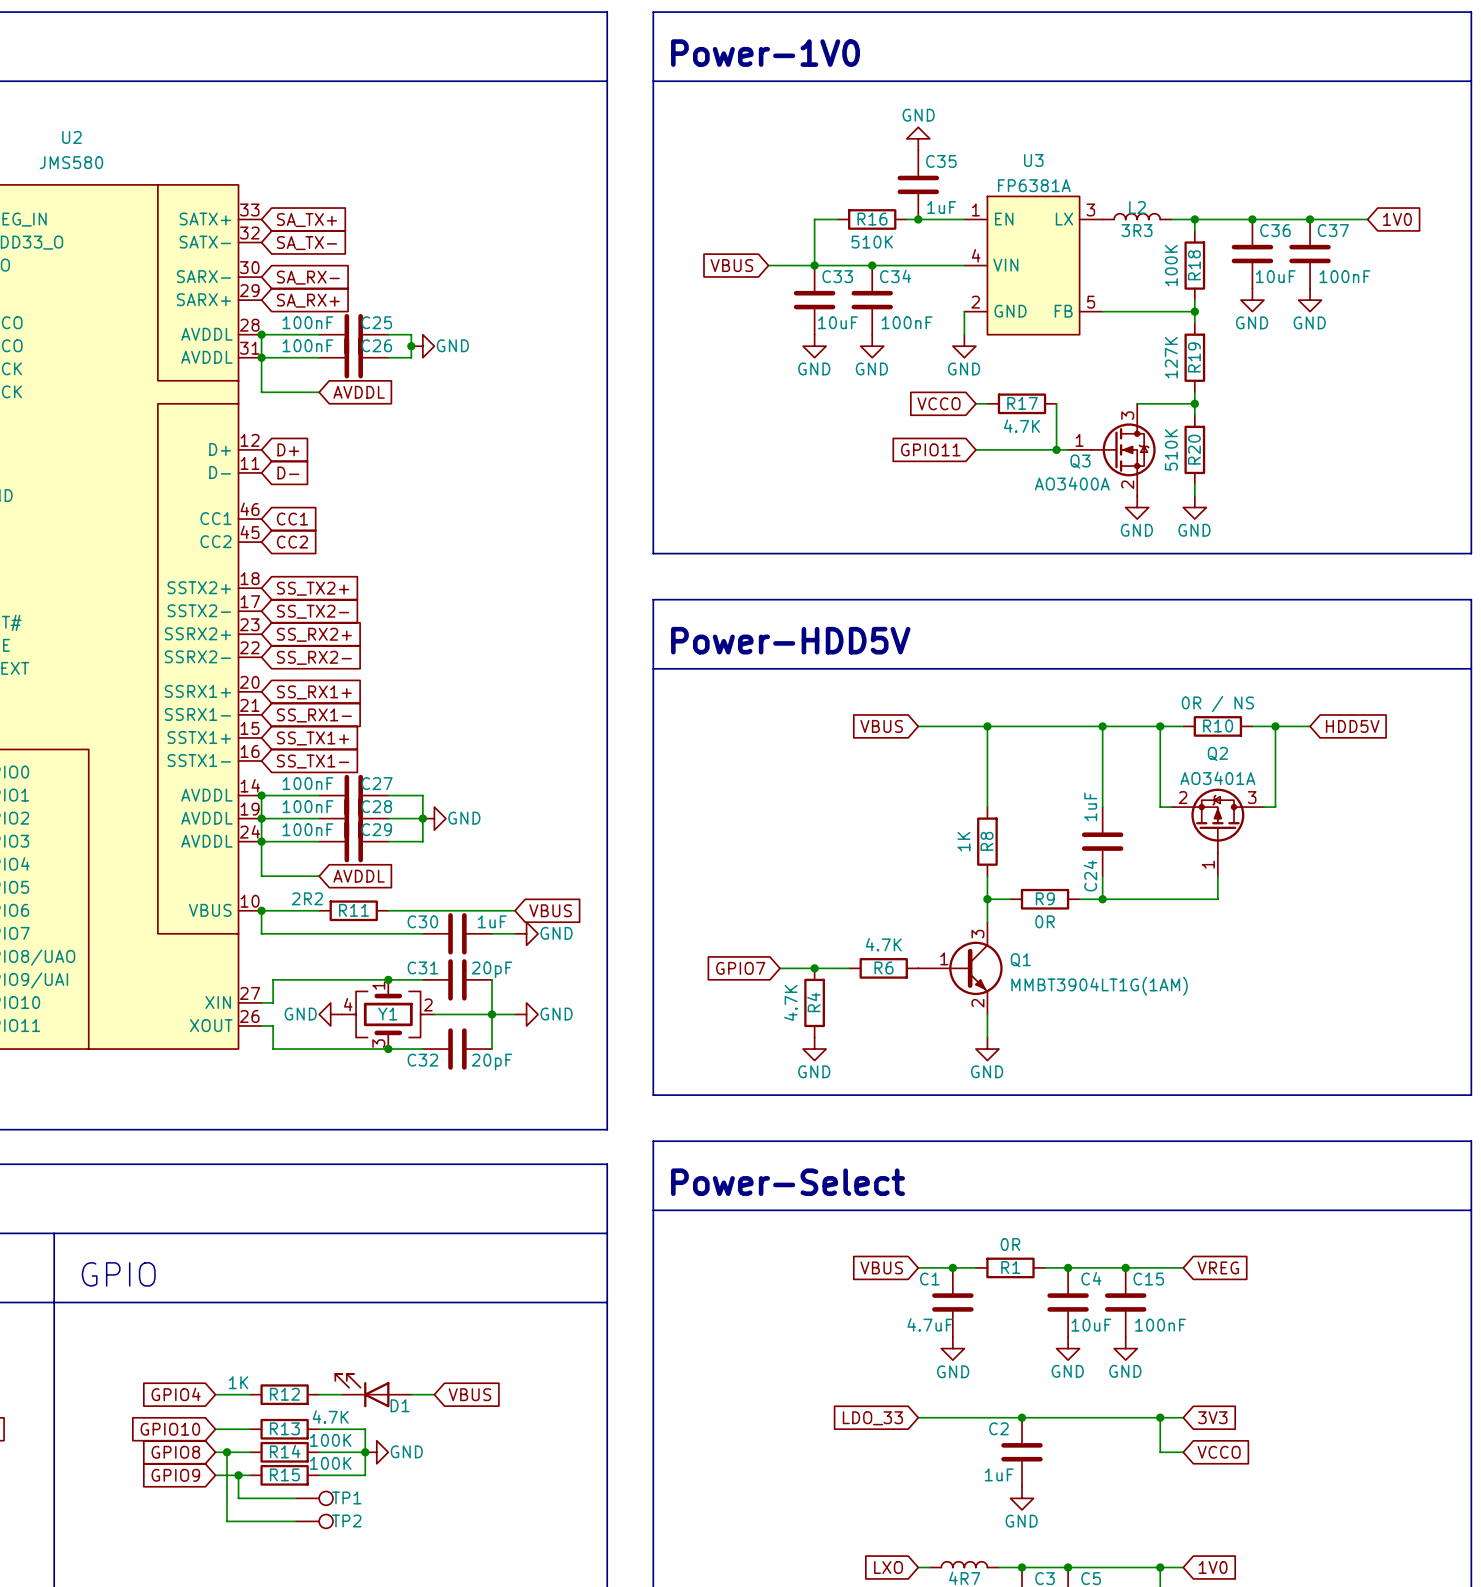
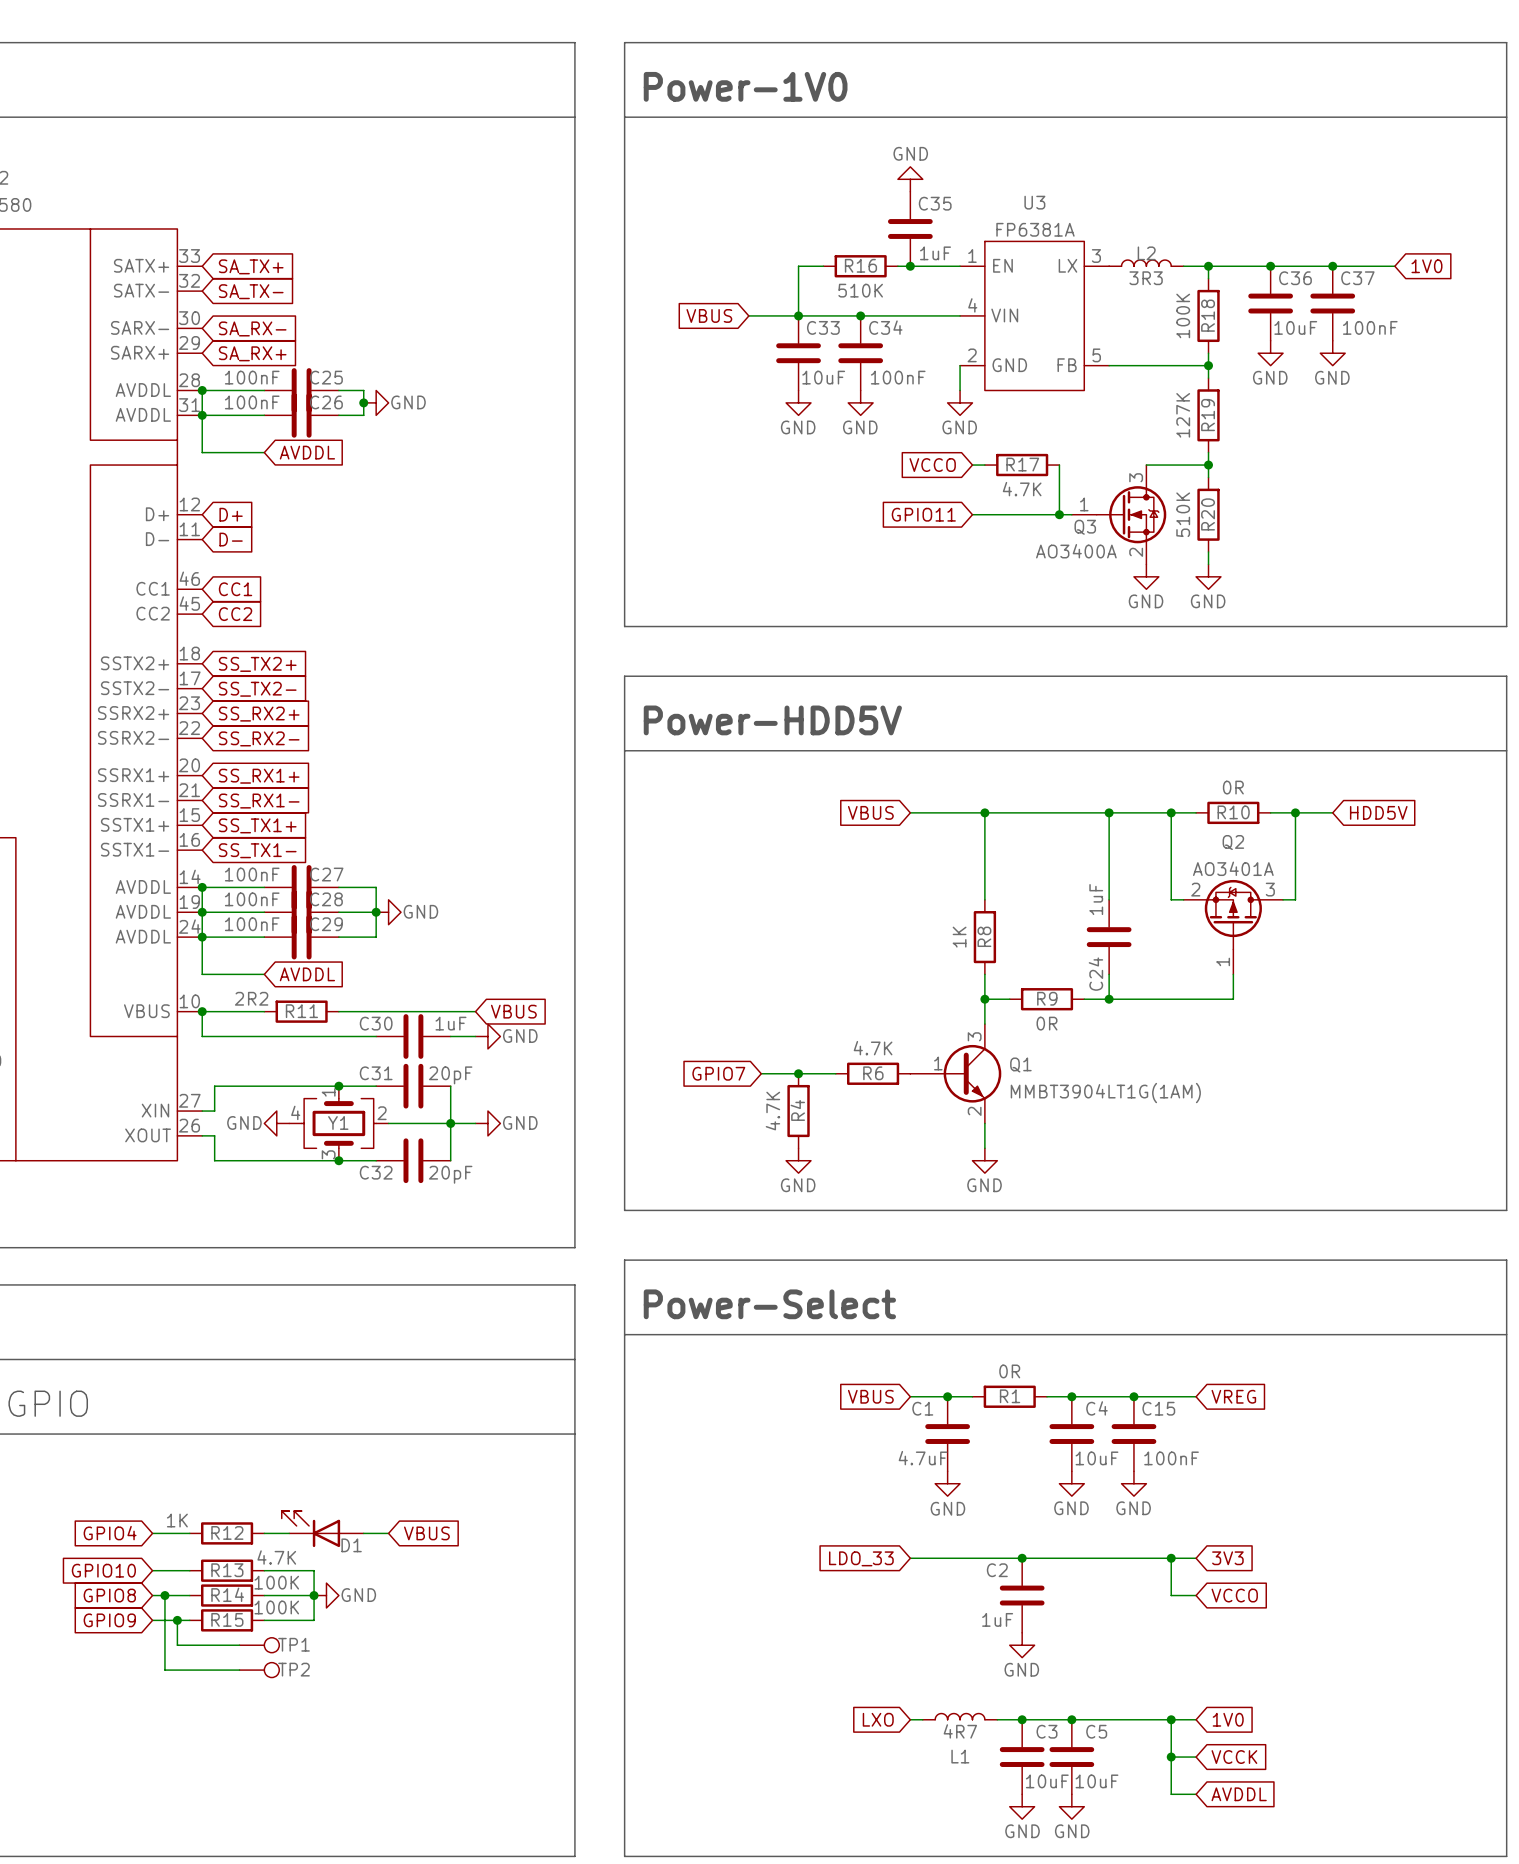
R10 value: 0R / NS (1217, 704) -> 0R (1233, 787)

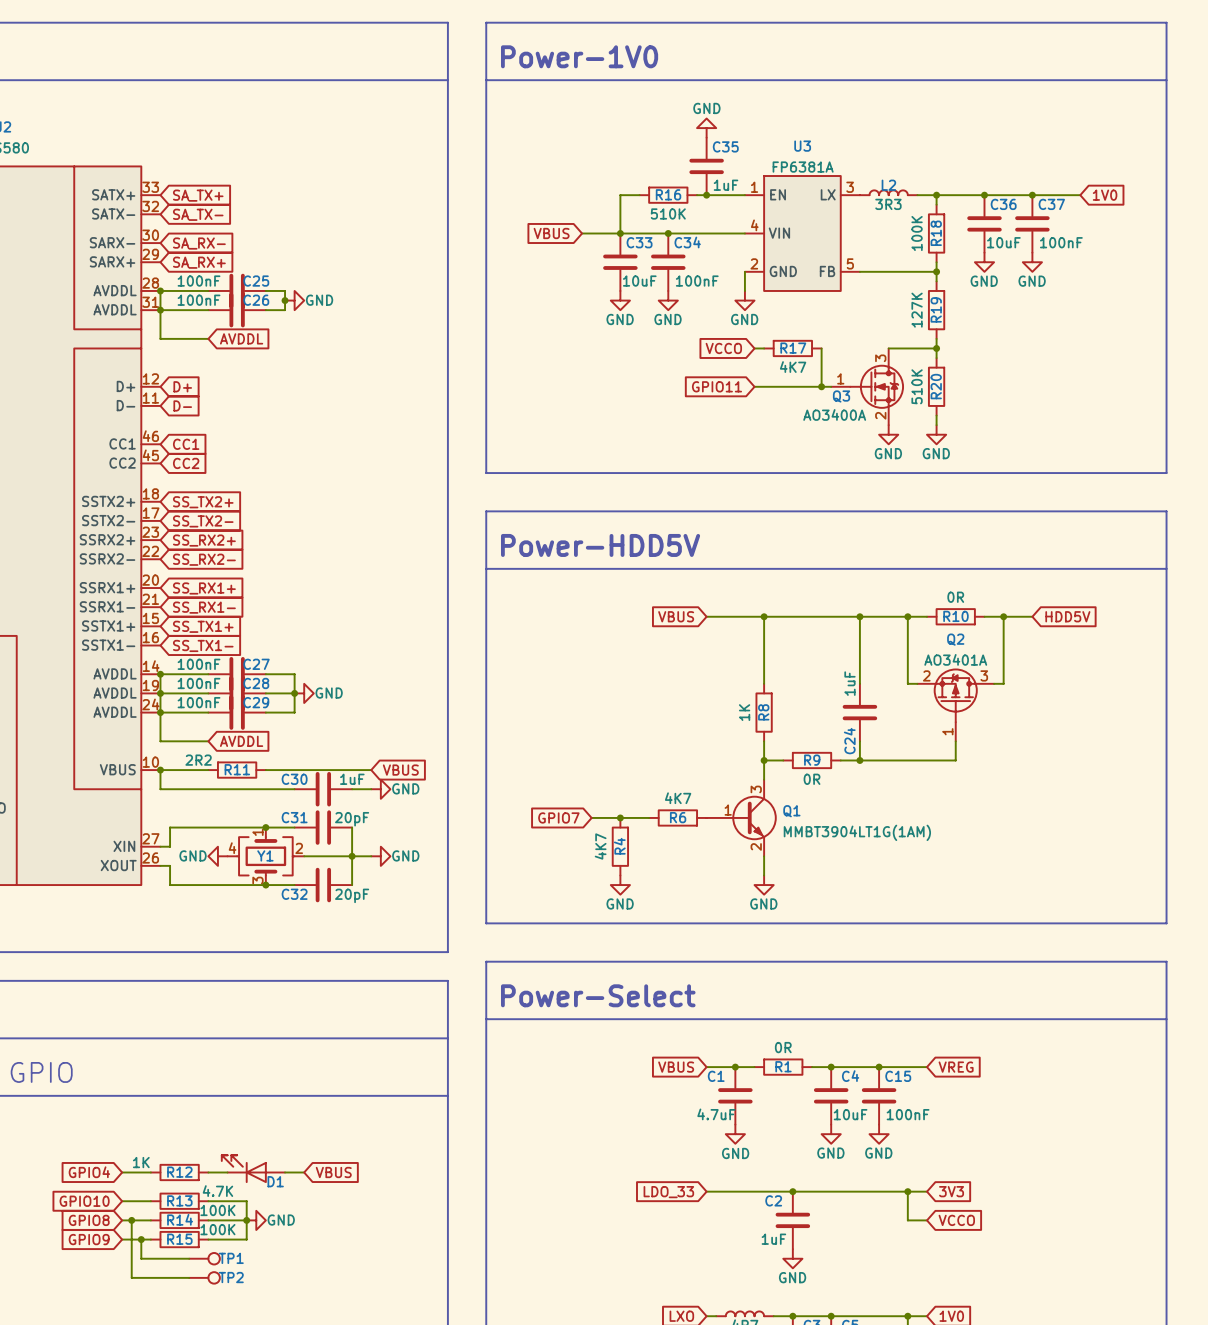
R17 value: 4.7K (1022, 489) -> 4K7 (793, 367)
R6 value: 4.7K (873, 1048) -> 4K7 (678, 798)
R4 value: 4.7K (772, 1111) -> 4K7 (600, 846)

